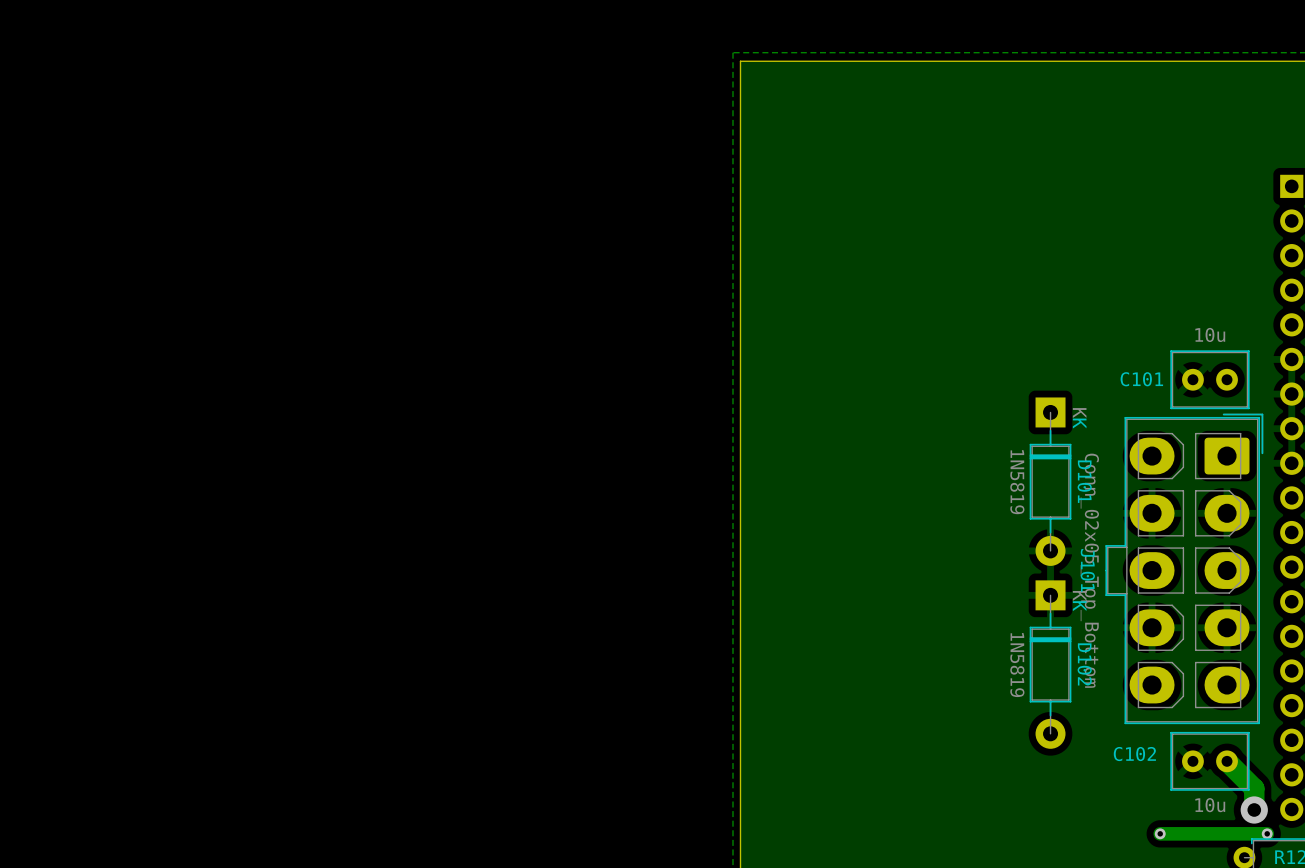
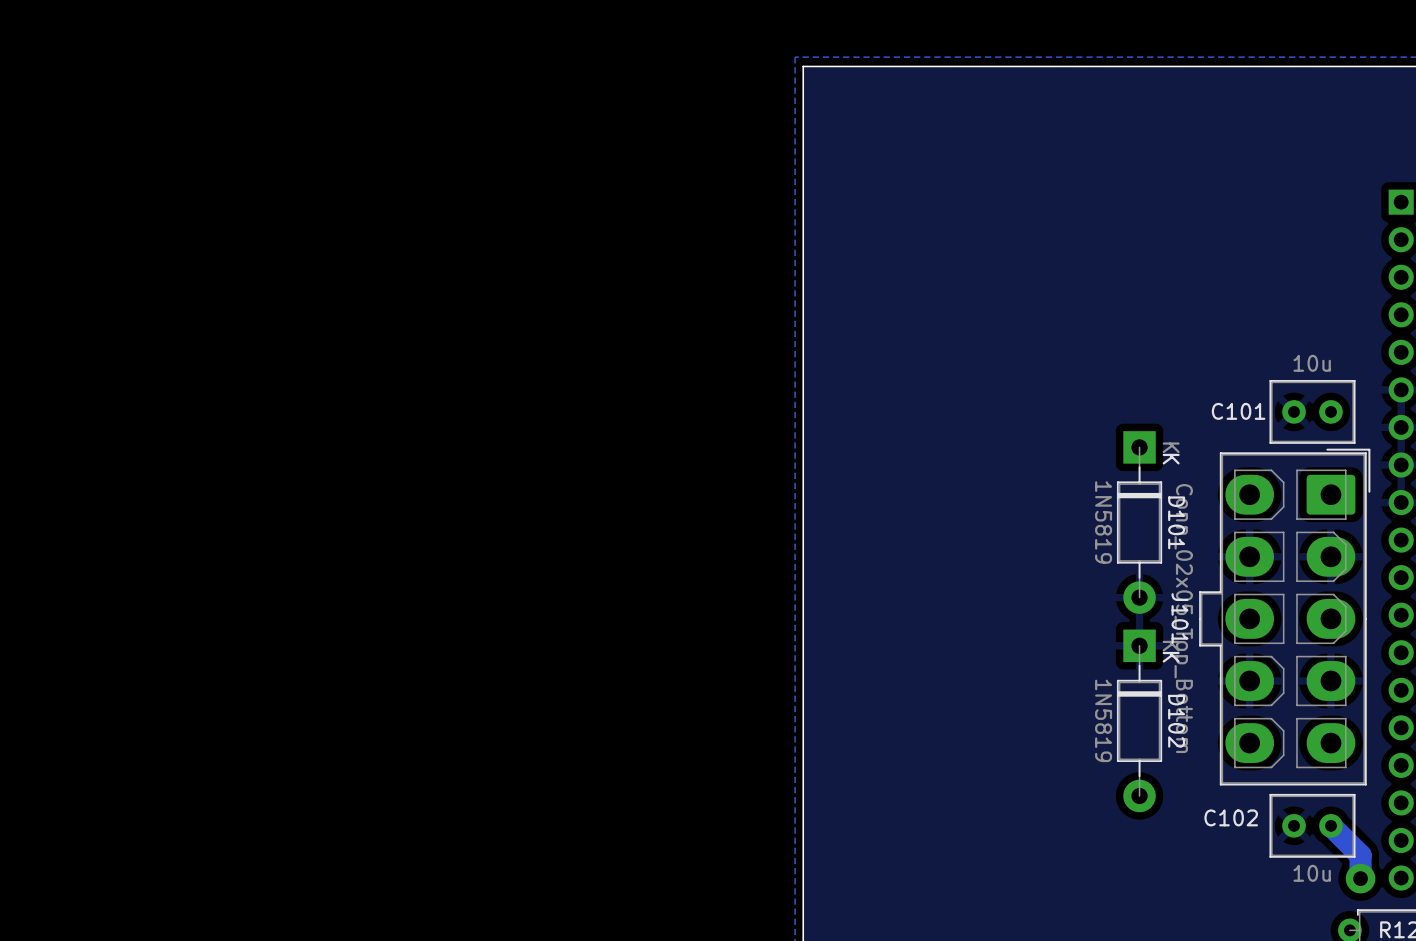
via: (1160, 833) -> none
track: (1267, 833) (1160, 833) -> none
via: (1267, 833) -> none

